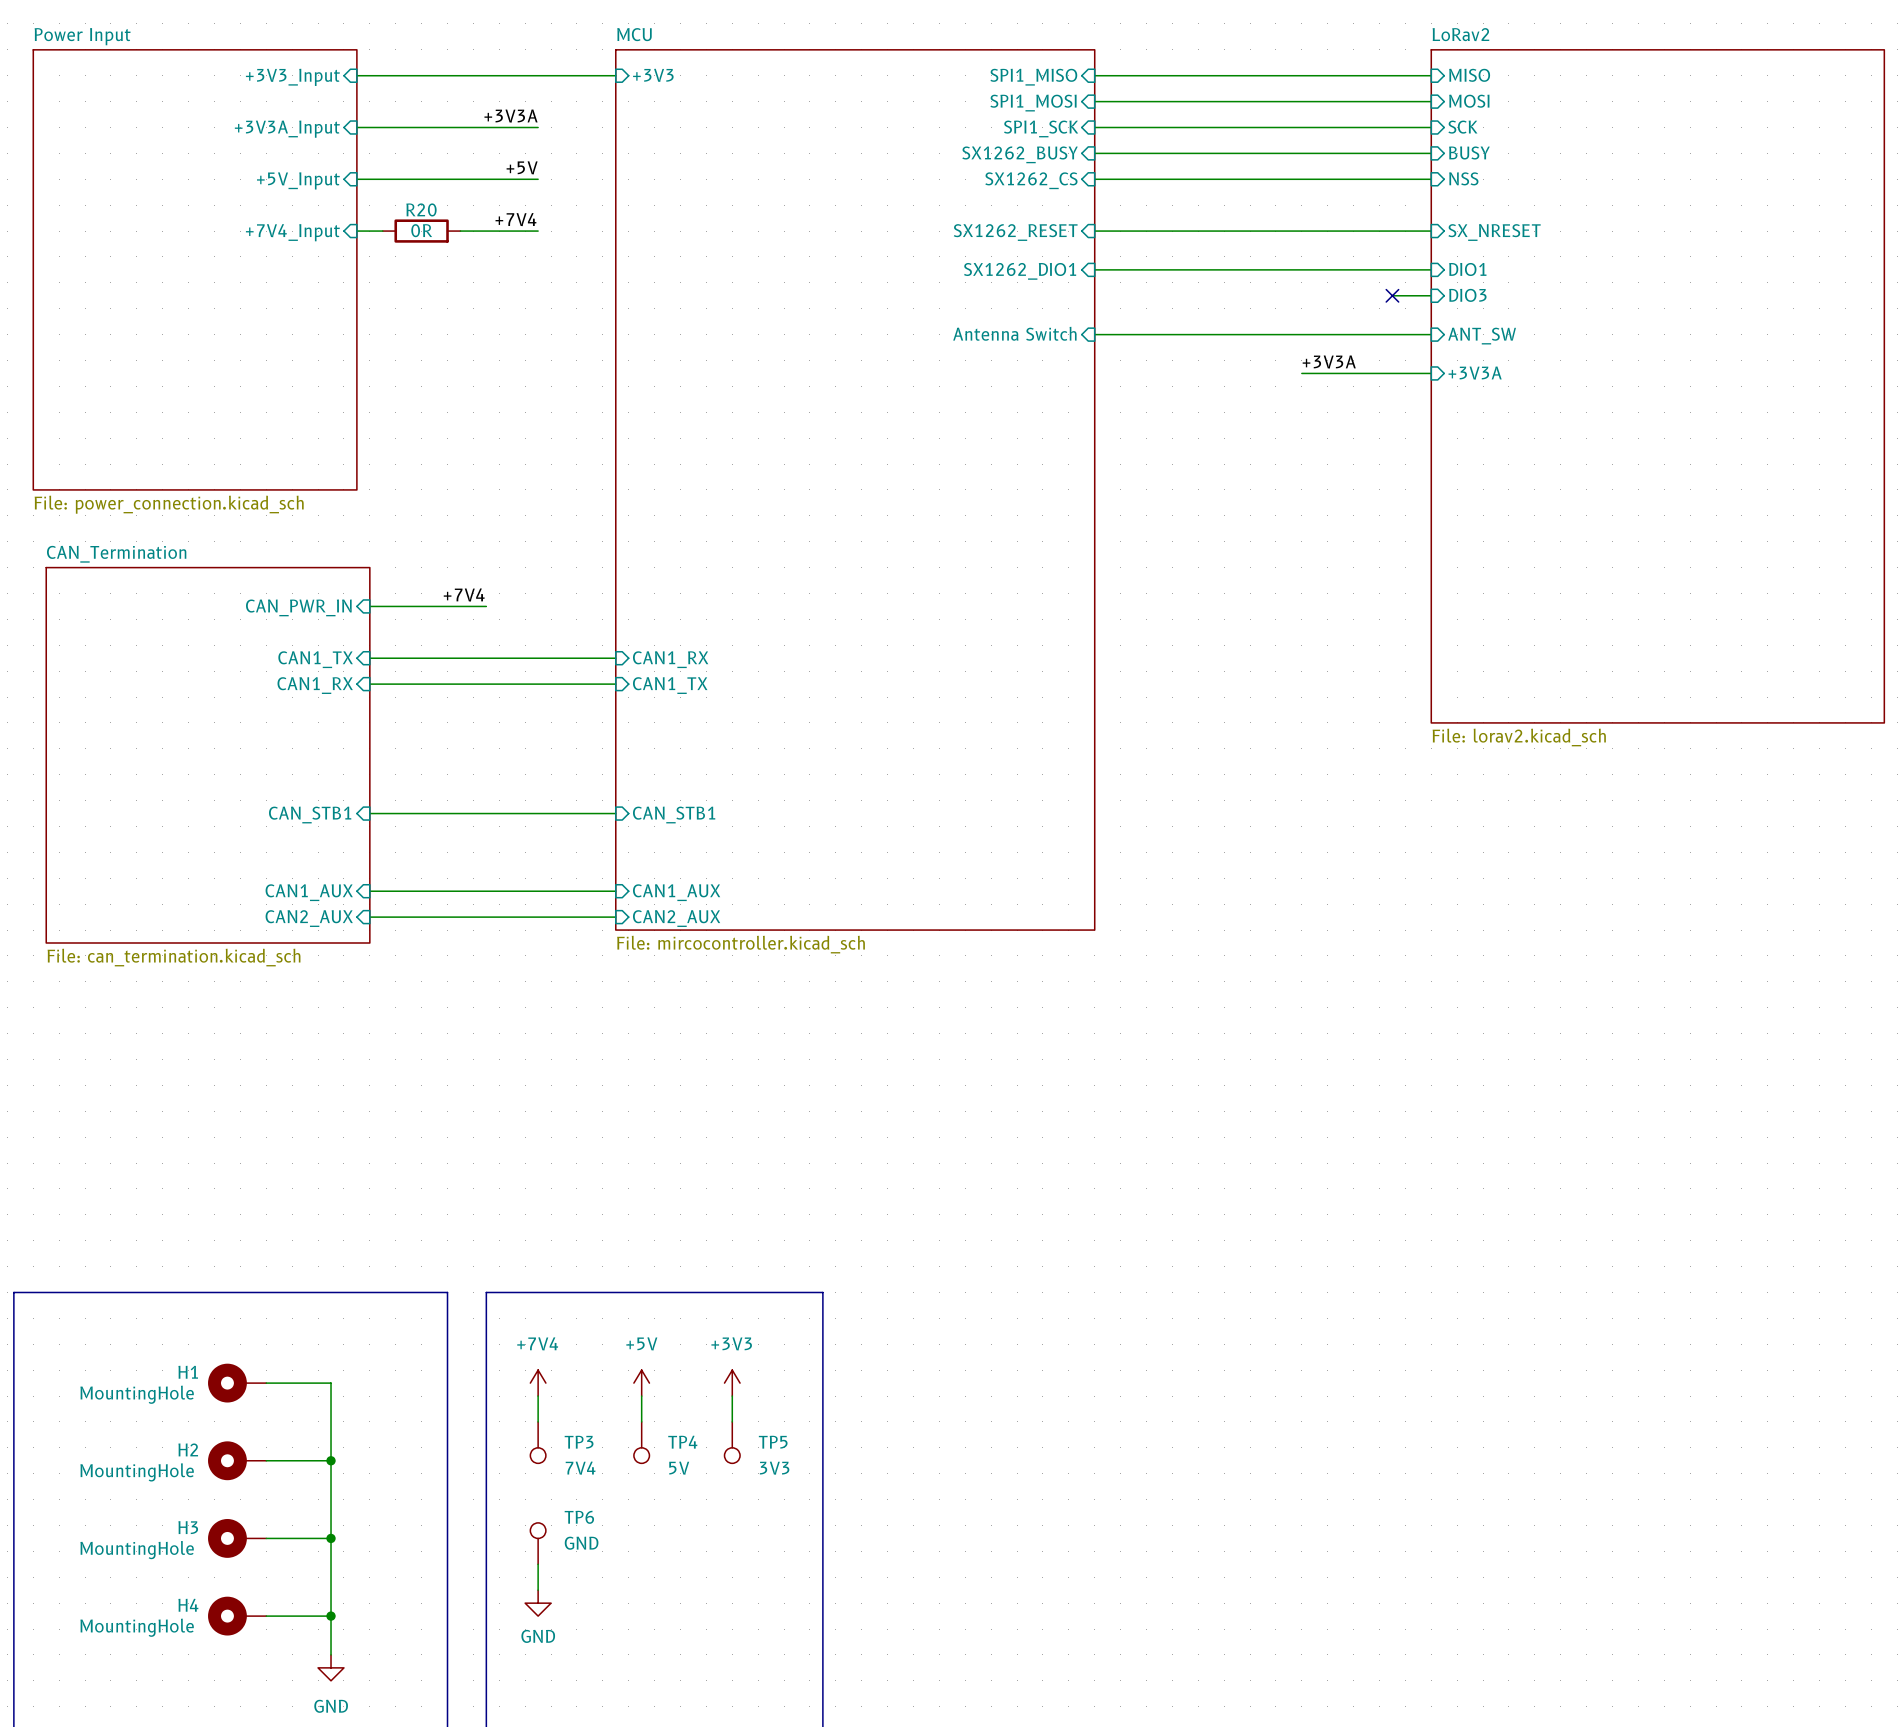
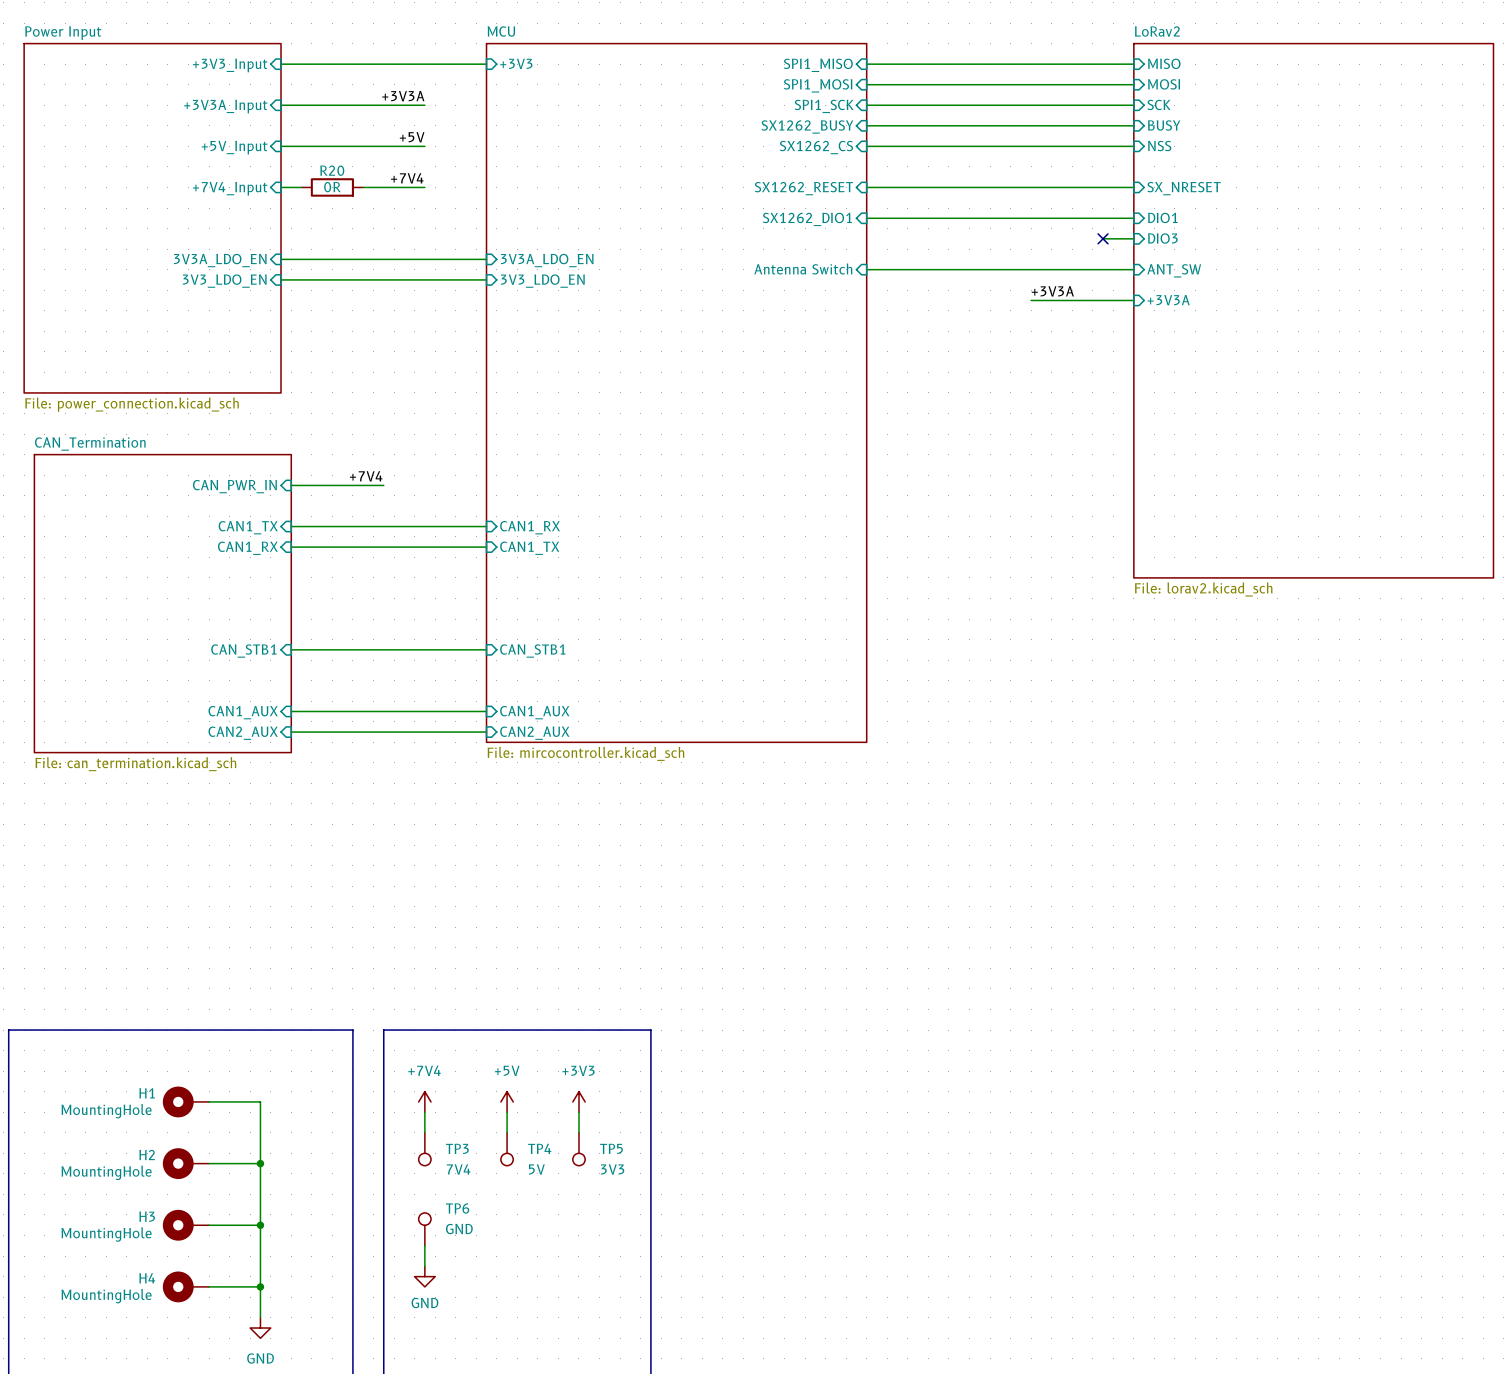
wire: none -> (281, 259) (486, 259)
sheet pin: none -> 3V3A_LDO_EN (220, 260)
sheet pin: none -> 3V3A_LDO_EN (547, 260)
wire: none -> (281, 279) (486, 279)
sheet pin: none -> 3V3_LDO_EN (224, 281)
sheet pin: none -> 3V3_LDO_EN (542, 281)

